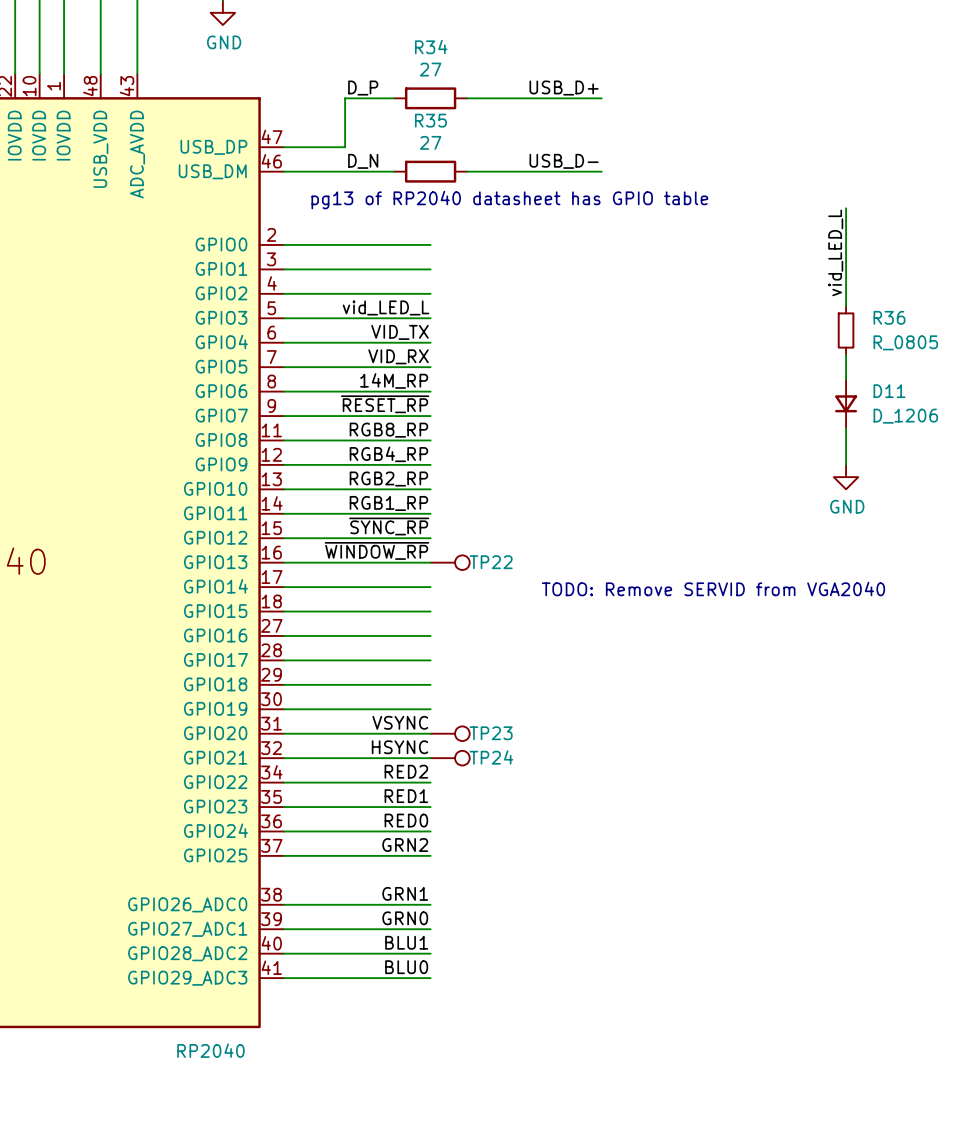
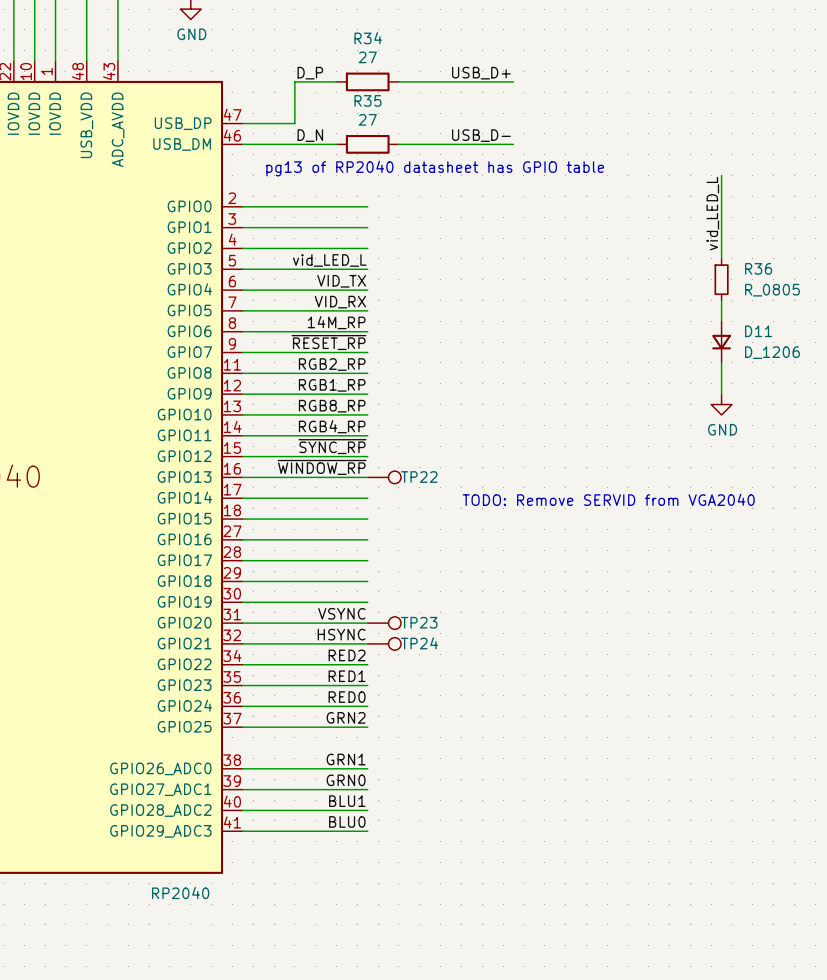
label: RGB8_RP (388, 430) -> RGB2_RP (332, 364)
label: RGB4_RP (388, 454) -> RGB1_RP (332, 385)
label: RGB2_RP (388, 479) -> RGB8_RP (332, 406)
label: RGB1_RP (388, 503) -> RGB4_RP (332, 426)

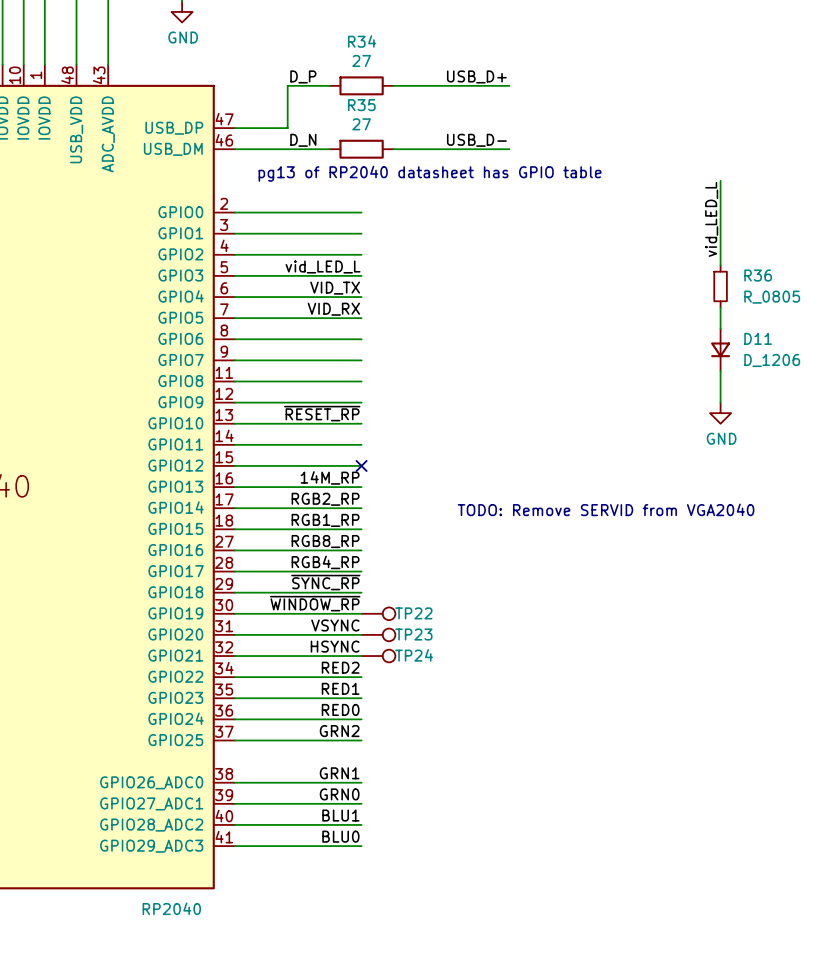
label: 14M_RP (336, 322) -> none
label: ~{RESET_RP} (328, 342) -> none
label position: RGB2_RP (332, 364) -> RGB2_RP (325, 499)
label position: RGB1_RP (332, 385) -> RGB1_RP (325, 520)
label: RGB8_RP (332, 406) -> ~{RESET_RP} (322, 413)
label position: RGB4_RP (332, 426) -> RGB4_RP (325, 562)
label position: ~{SYNC_RP} (332, 446) -> ~{SYNC_RP} (325, 582)
no-connect mark: none -> (361, 465)
label: ~{WINDOW_RP} (322, 467) -> 14M_RP (330, 477)
TP22 position: (384, 477) -> (378, 613)
label: none -> RGB8_RP (325, 541)
label: none -> ~{WINDOW_RP} (315, 603)

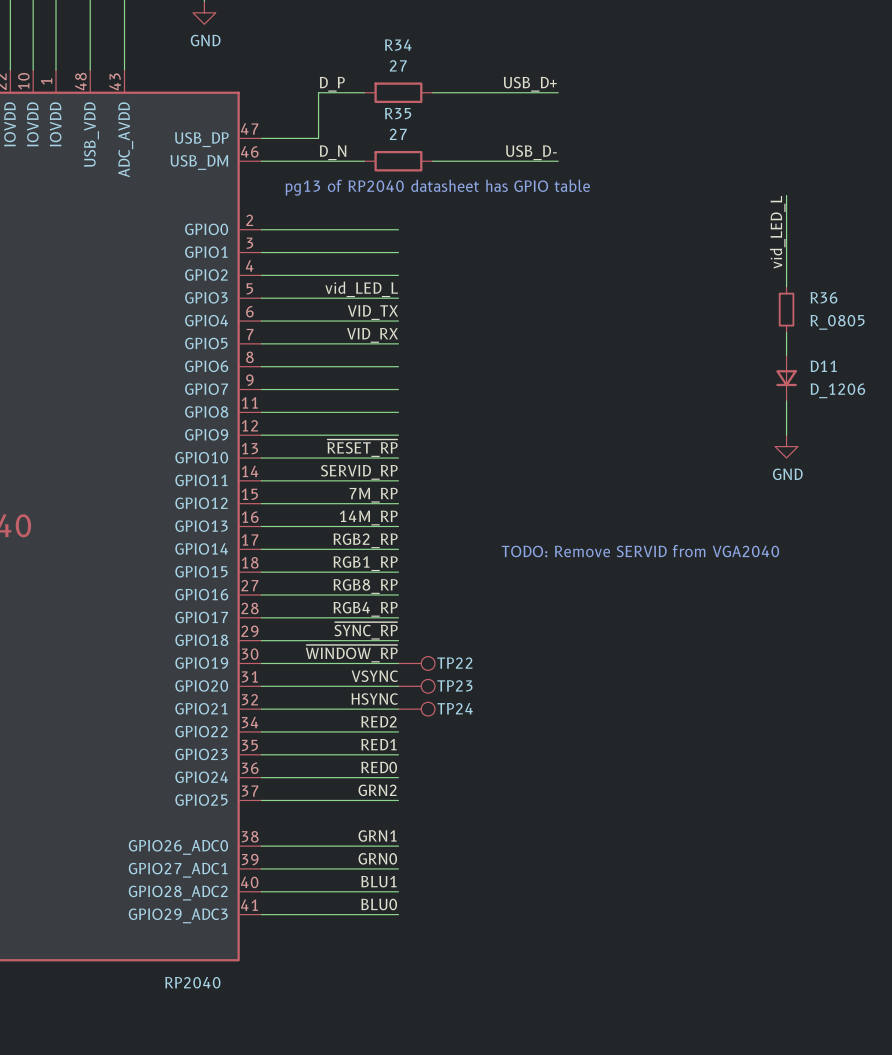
label: none -> SERVID_RP (359, 472)
label: none -> 7M_RP (373, 495)
no-connect mark: (361, 465) -> none

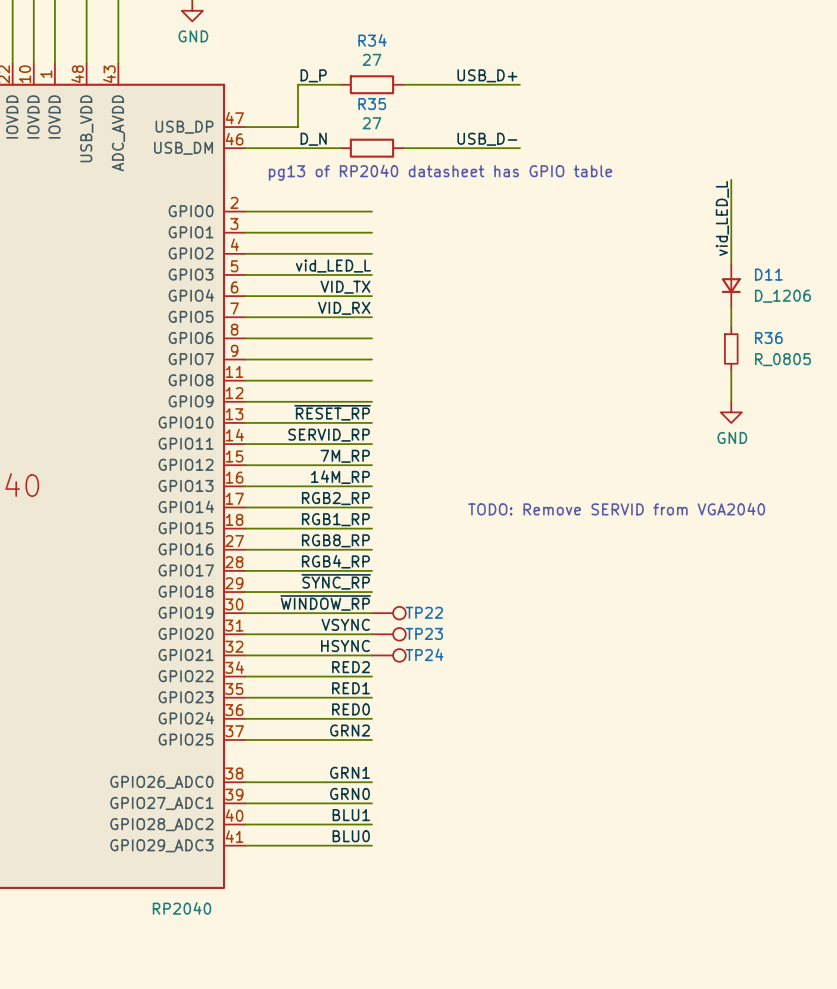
R36 position: (786, 309) -> (731, 348)
D11 position: (786, 378) -> (731, 285)

